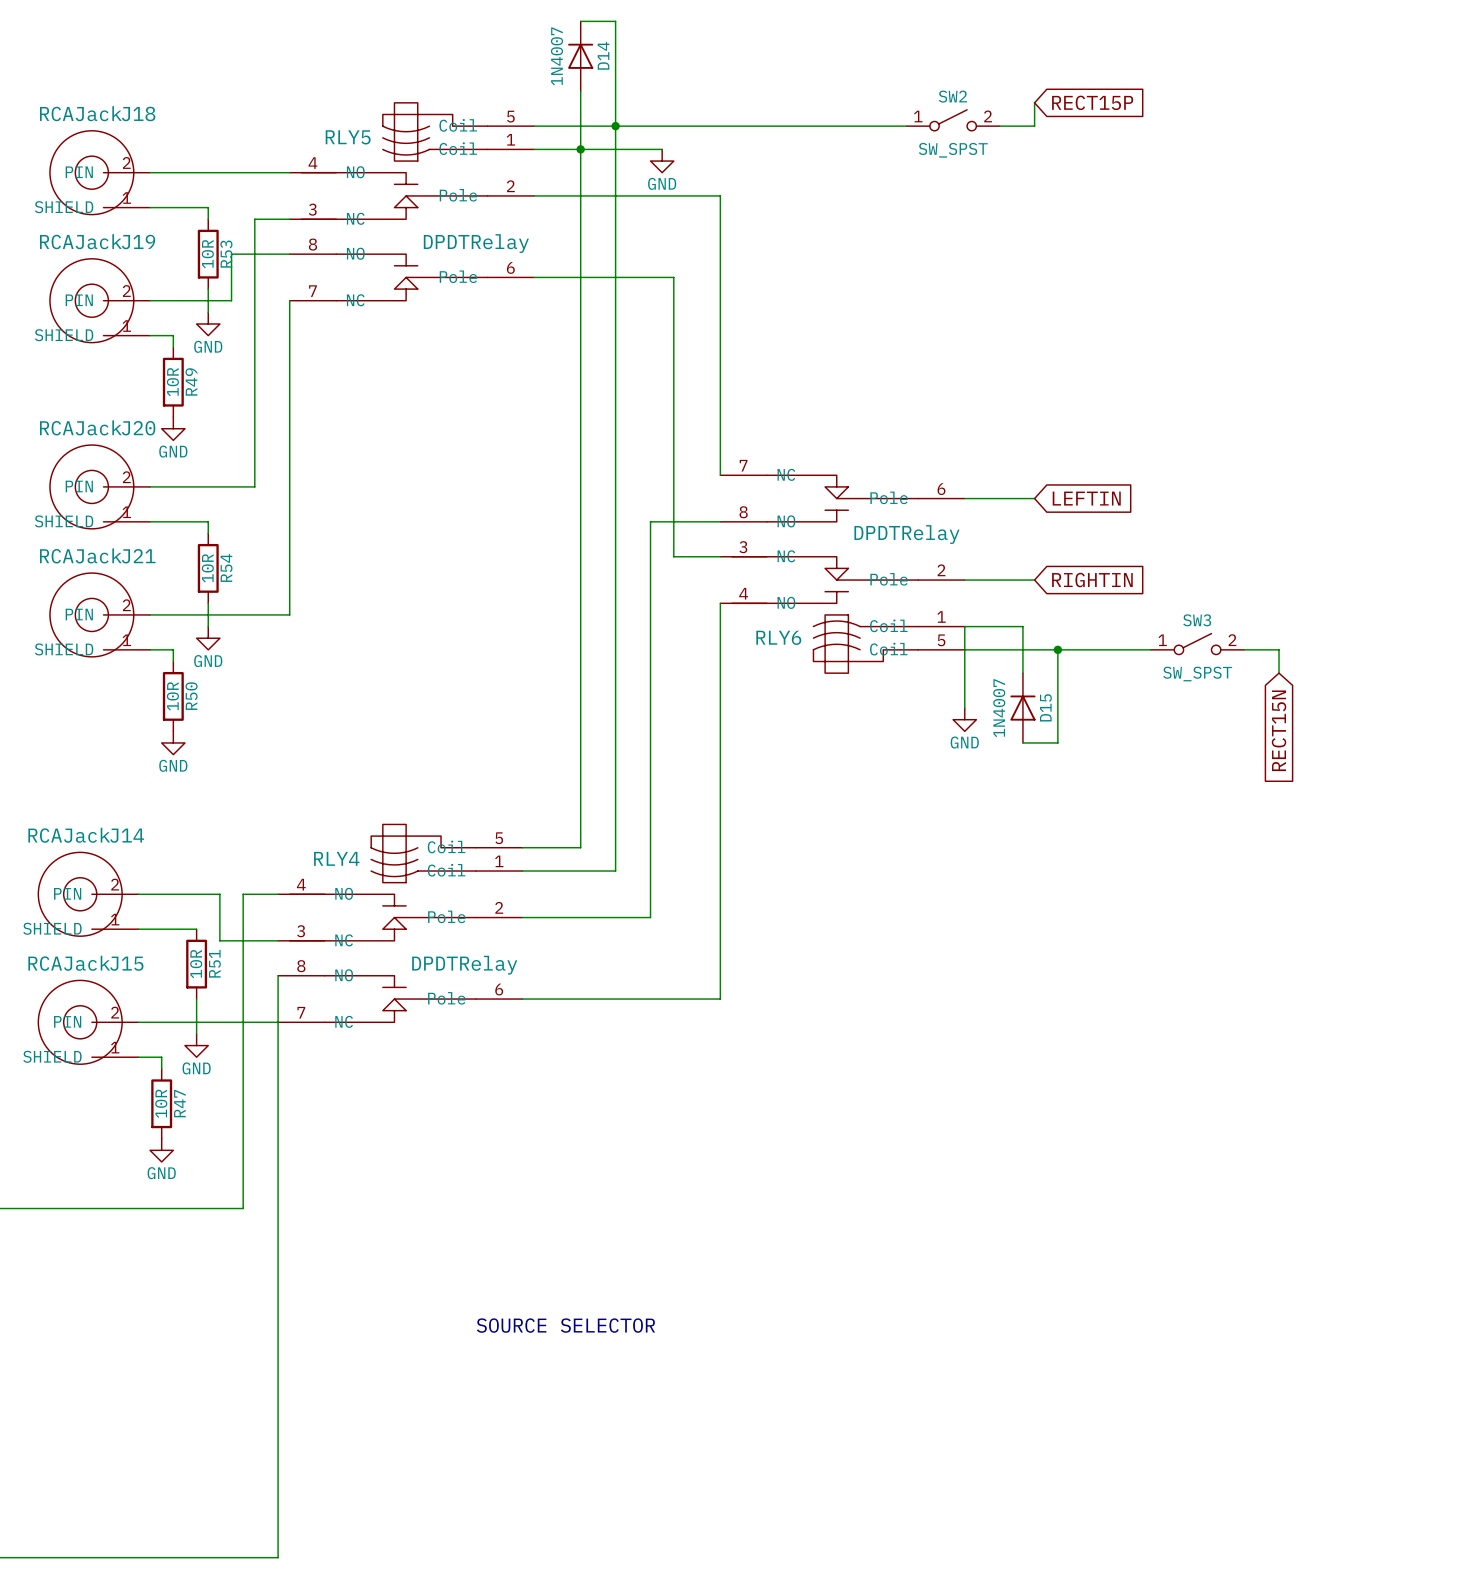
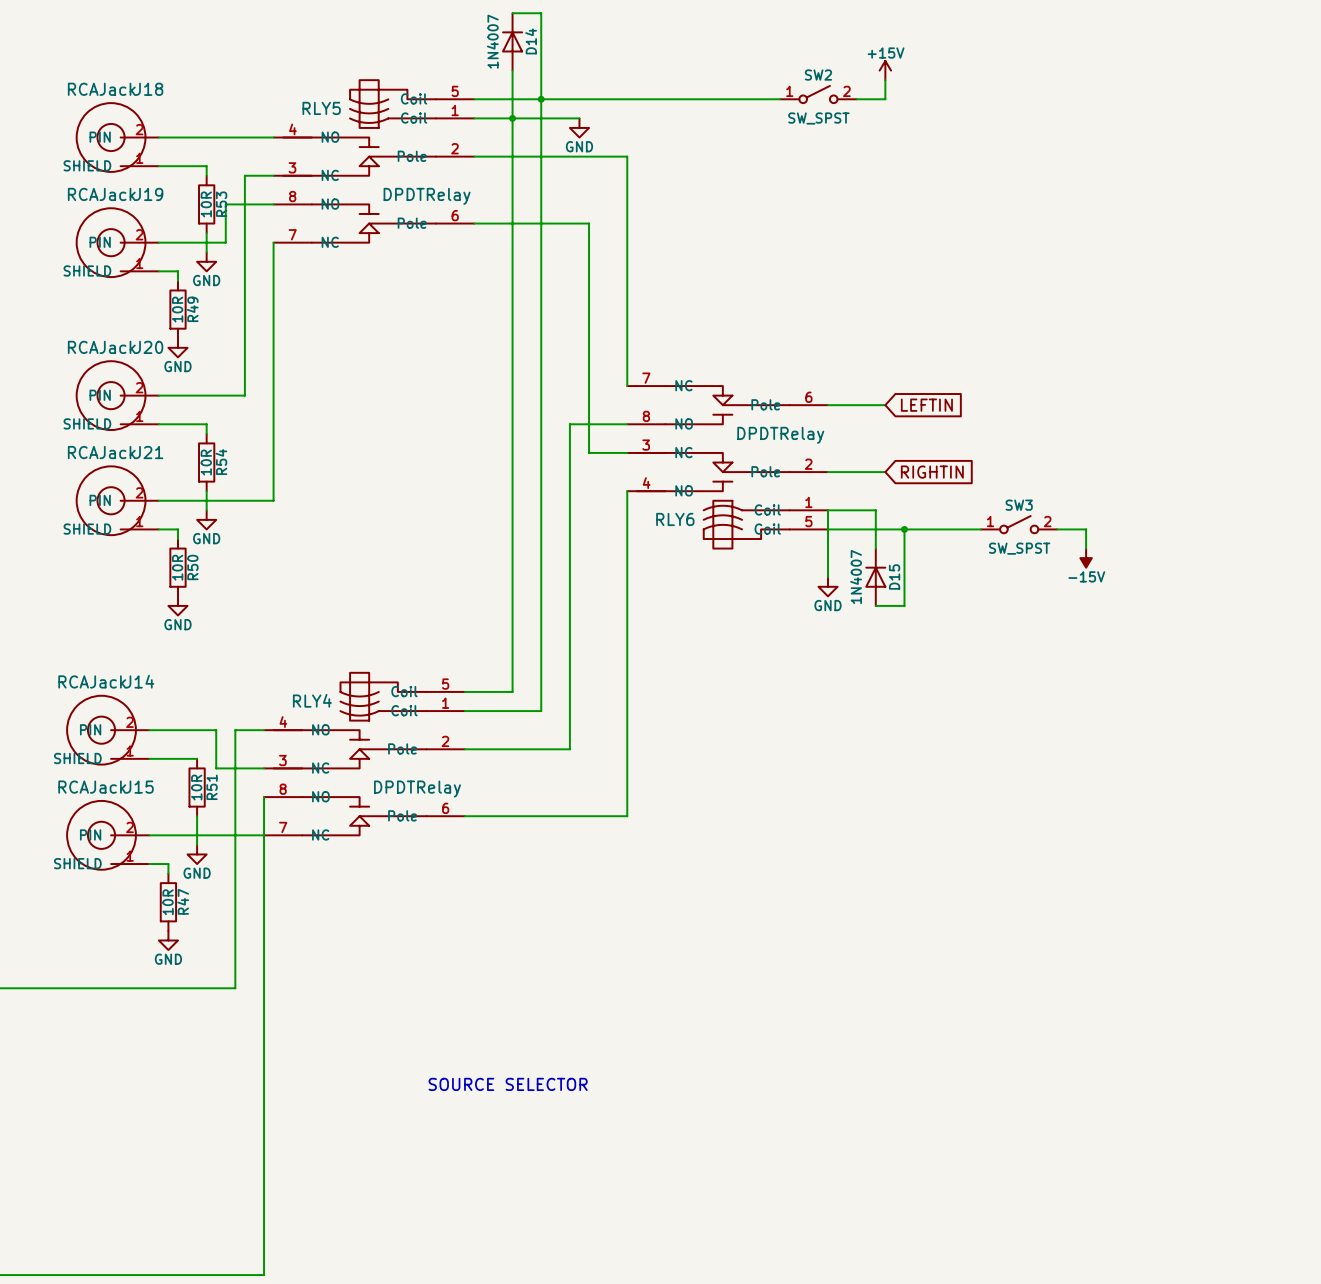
power symbol: none -> +15V (885, 70)
global label: RECT15P (1092, 102) -> none
power symbol: none -> -15V (1086, 558)
global label: RECT15N (1279, 730) -> none

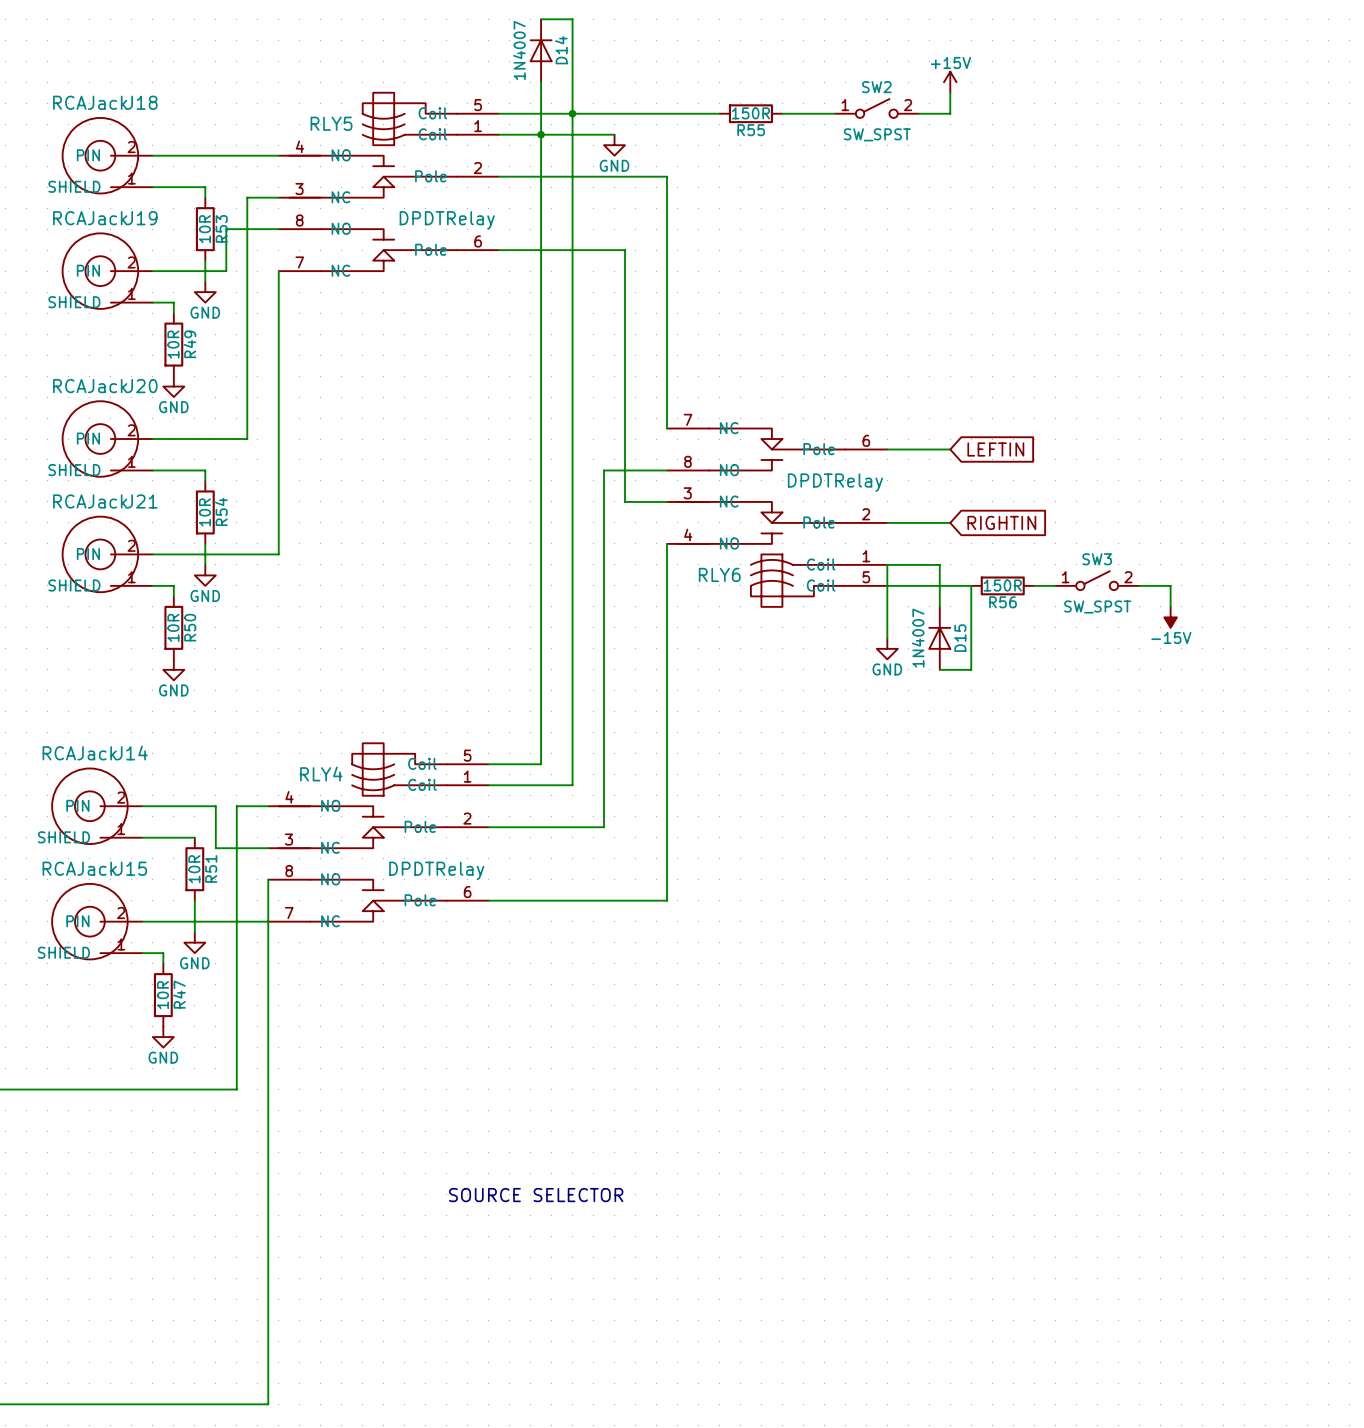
R55: none -> 150R (750, 113)
junction: (904, 529) -> none
R56: none -> 150R (1002, 585)

